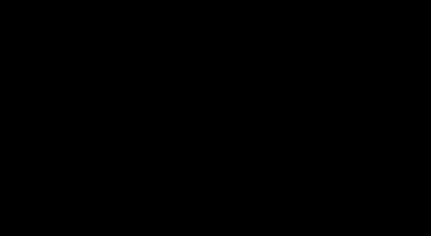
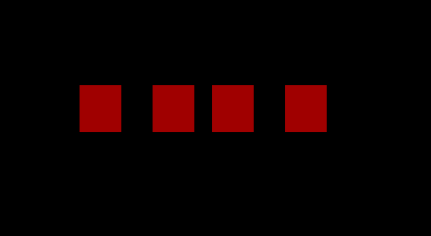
part: none -> (136, 108)
part: none -> (269, 108)

